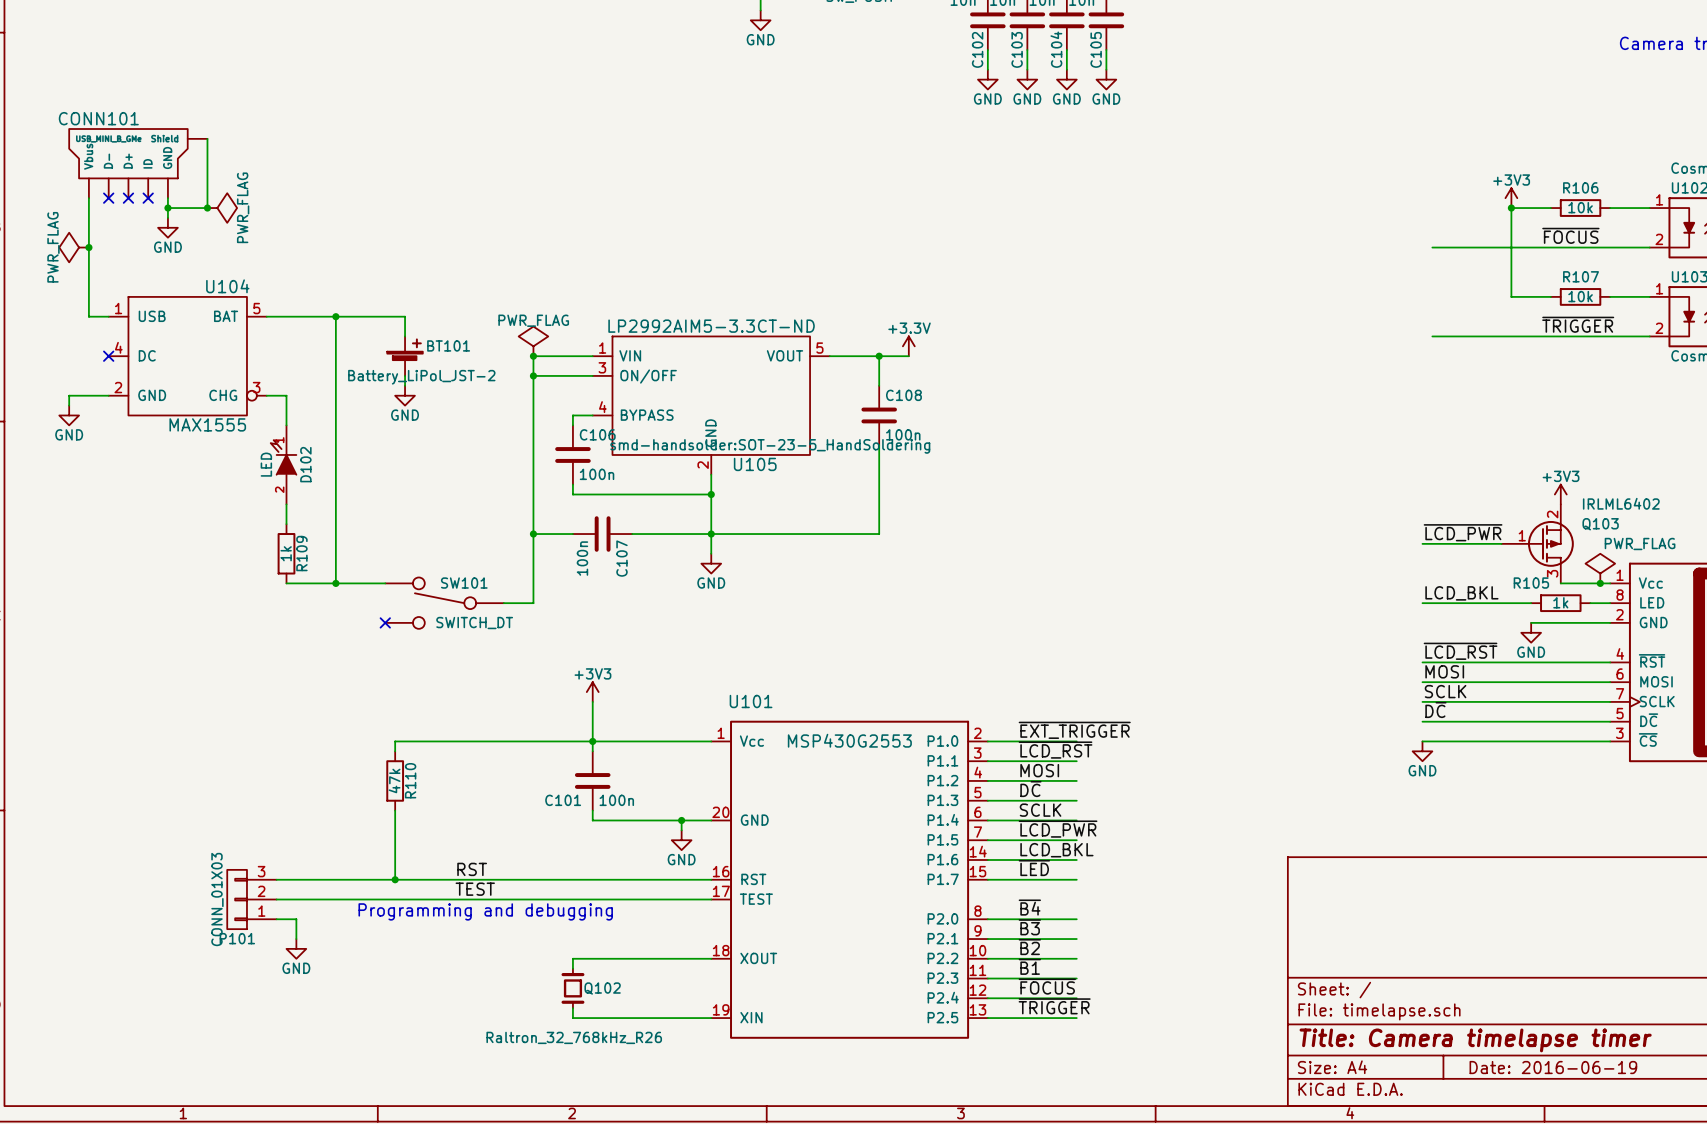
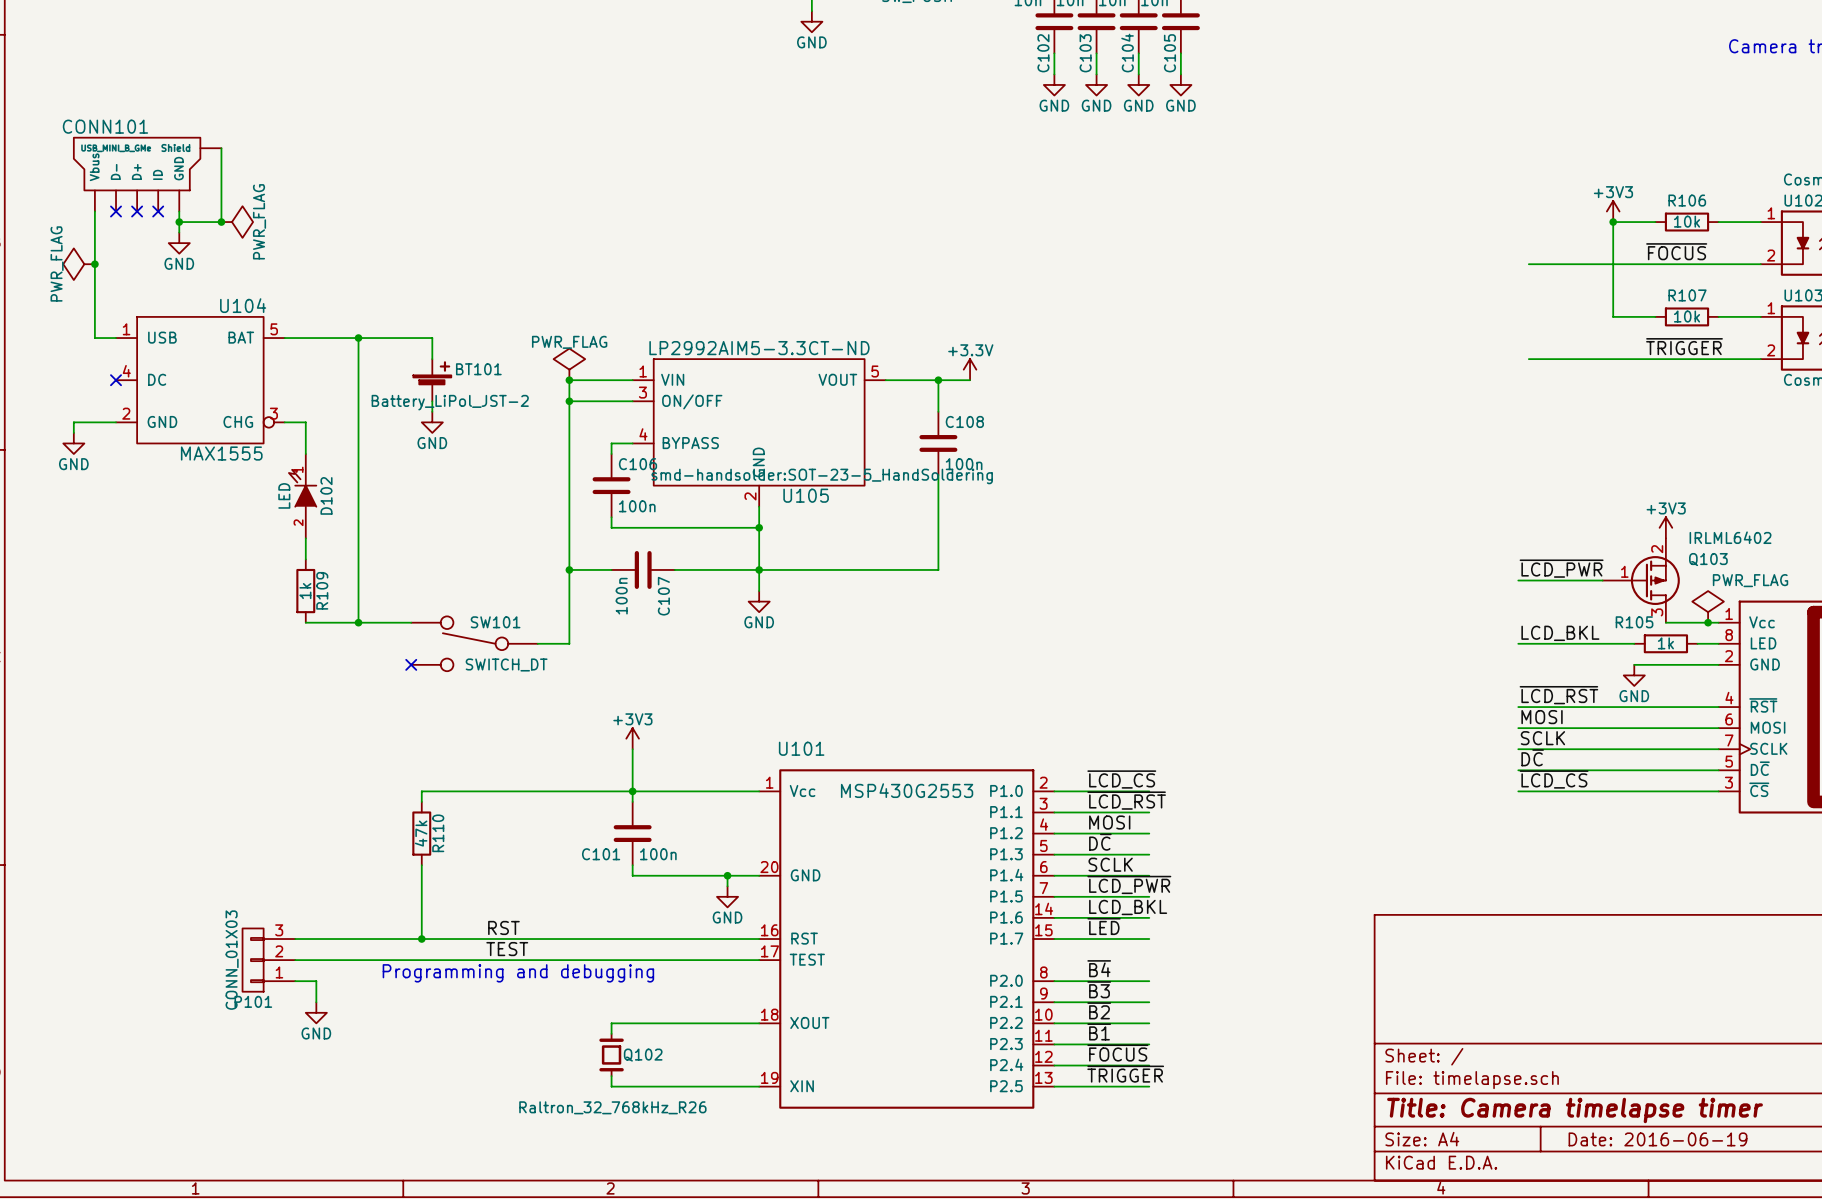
label: ~{EXT_TRIGGER} (1074, 730) -> ~{LCD_CS} (1121, 779)
label: none -> ~{LCD_CS} (1554, 779)
power symbol: GND (1422, 751) -> none

